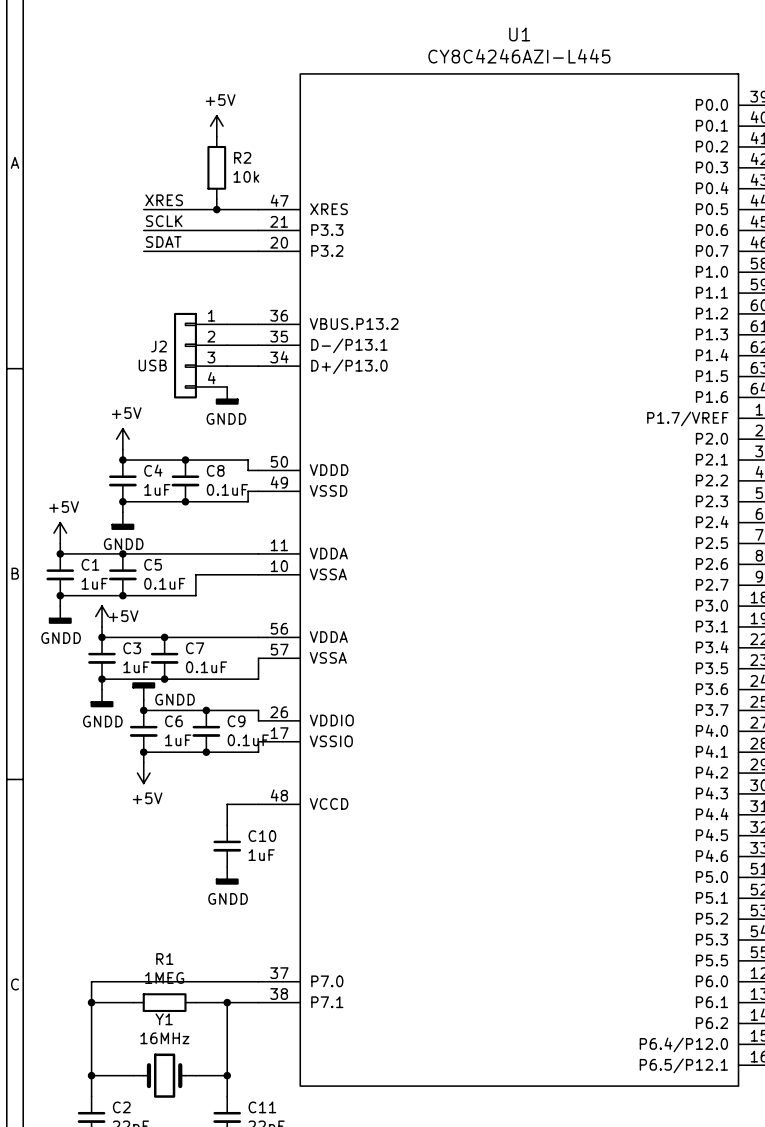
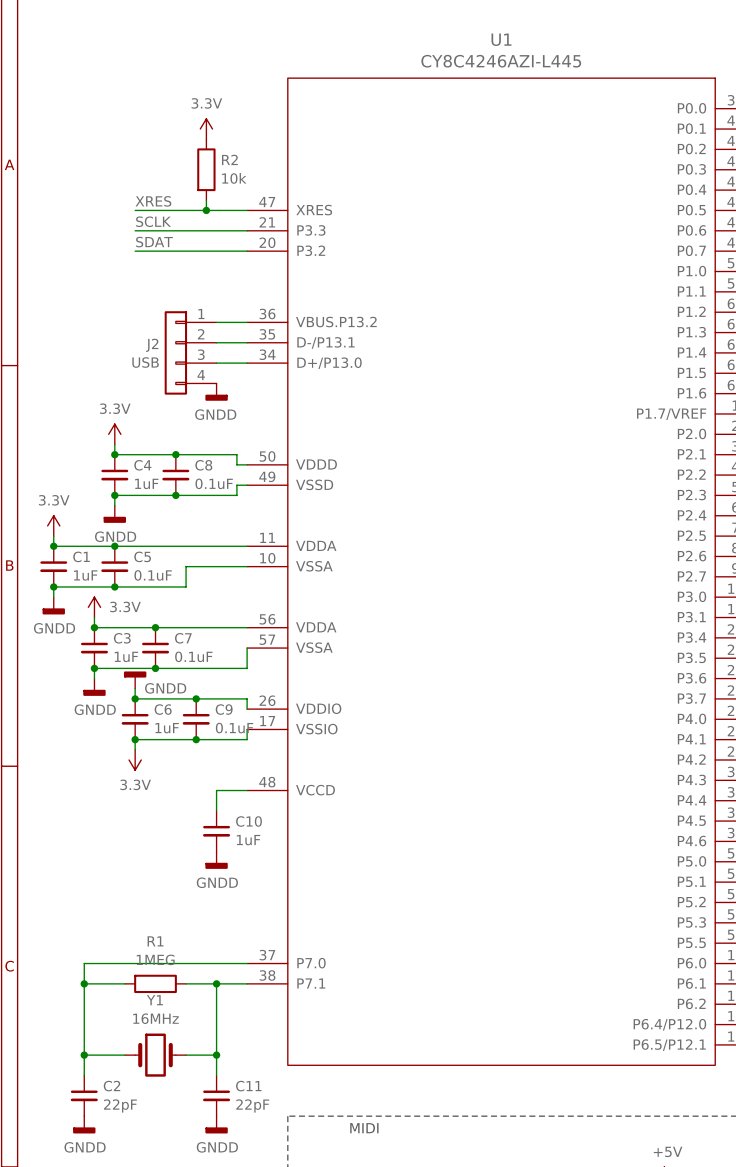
power symbol: +5V (216, 126) -> 3.3V (206, 129)
power symbol: +5V (122, 439) -> 3.3V (114, 434)
power symbol: +5V (60, 533) -> 3.3V (53, 525)
power symbol: +5V (102, 616) -> 3.3V (94, 607)
power symbol: +5V (143, 773) -> 3.3V (135, 759)

